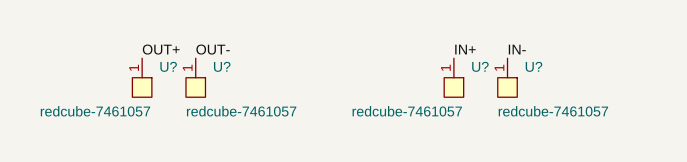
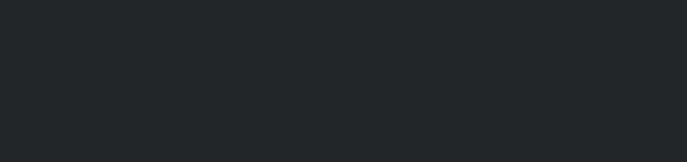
label: OUT+ (161, 49) -> none
label: OUT- (213, 49) -> none
label: IN+ (465, 49) -> none
label: IN- (517, 49) -> none
U?: redcube-7461057 (142, 77) -> none
U?: redcube-7461057 (195, 77) -> none
U?: redcube-7461057 (453, 77) -> none
U?: redcube-7461057 (507, 77) -> none

